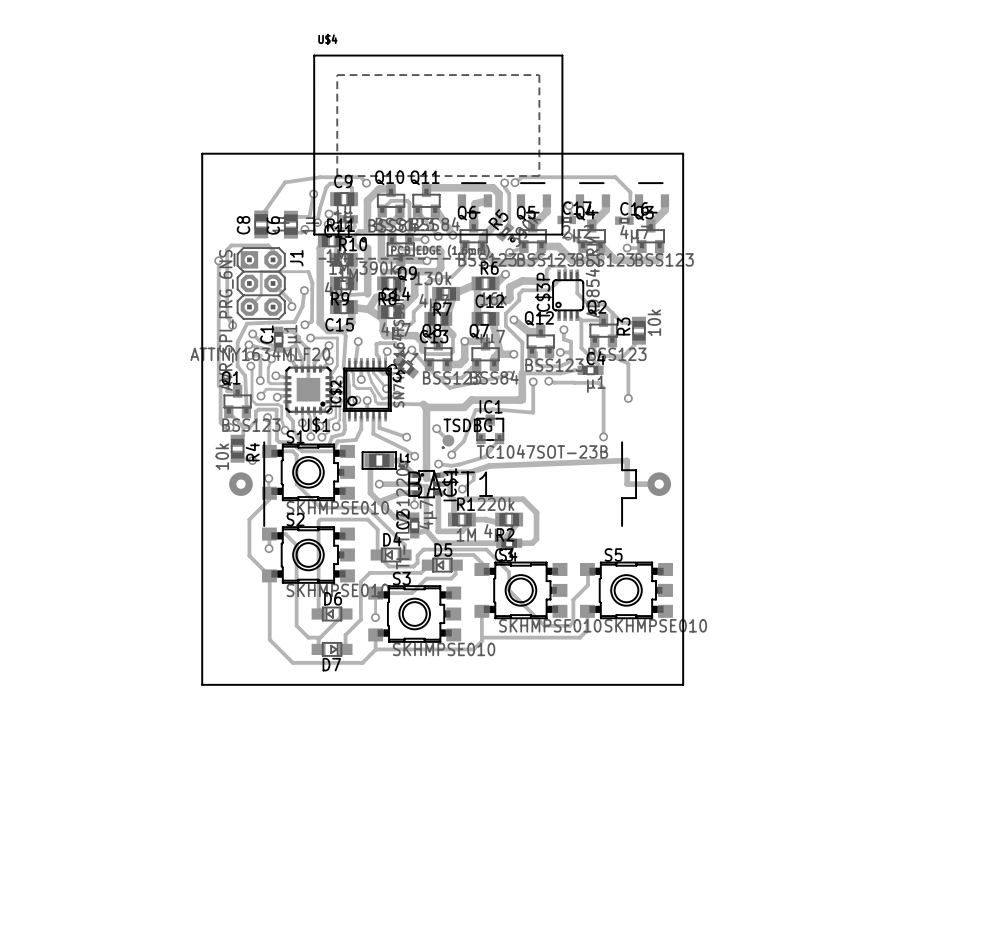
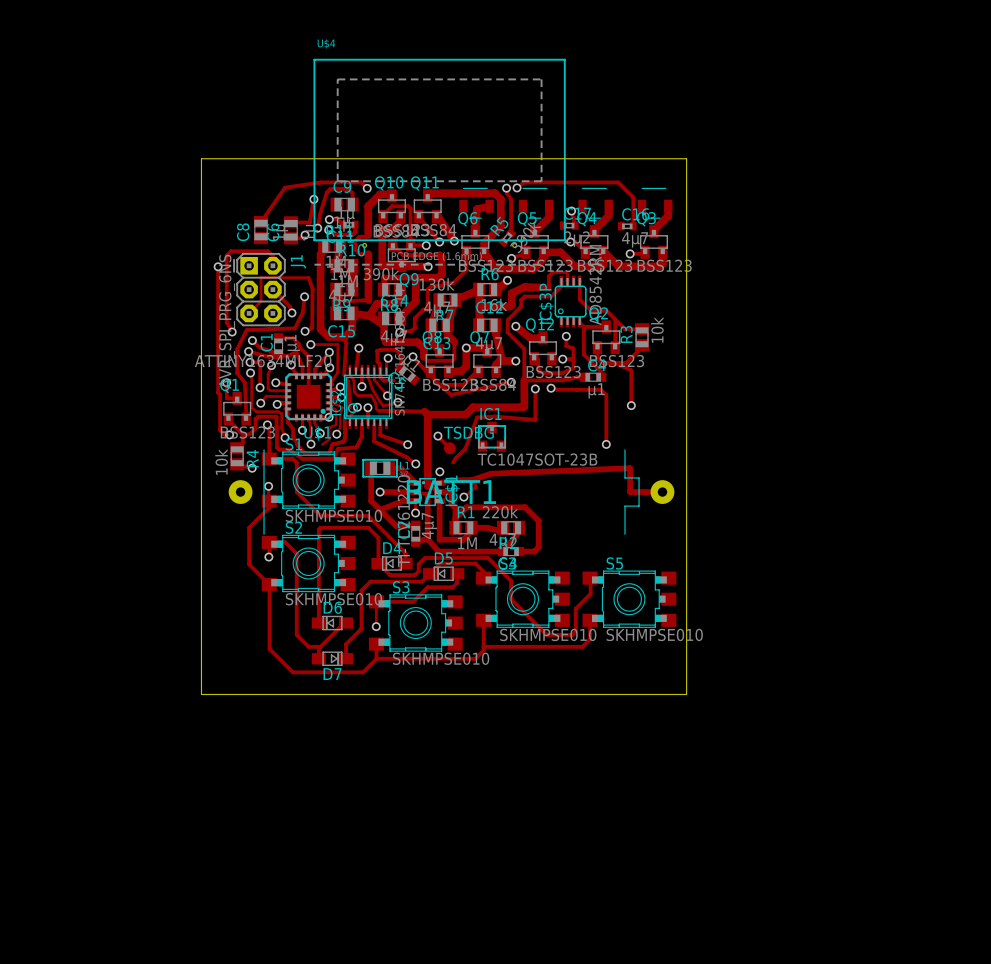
via: (321, 437) -> none
track: (499, 438) (485, 457) (459, 464) (438, 464) -> none
via: (451, 454) -> none

